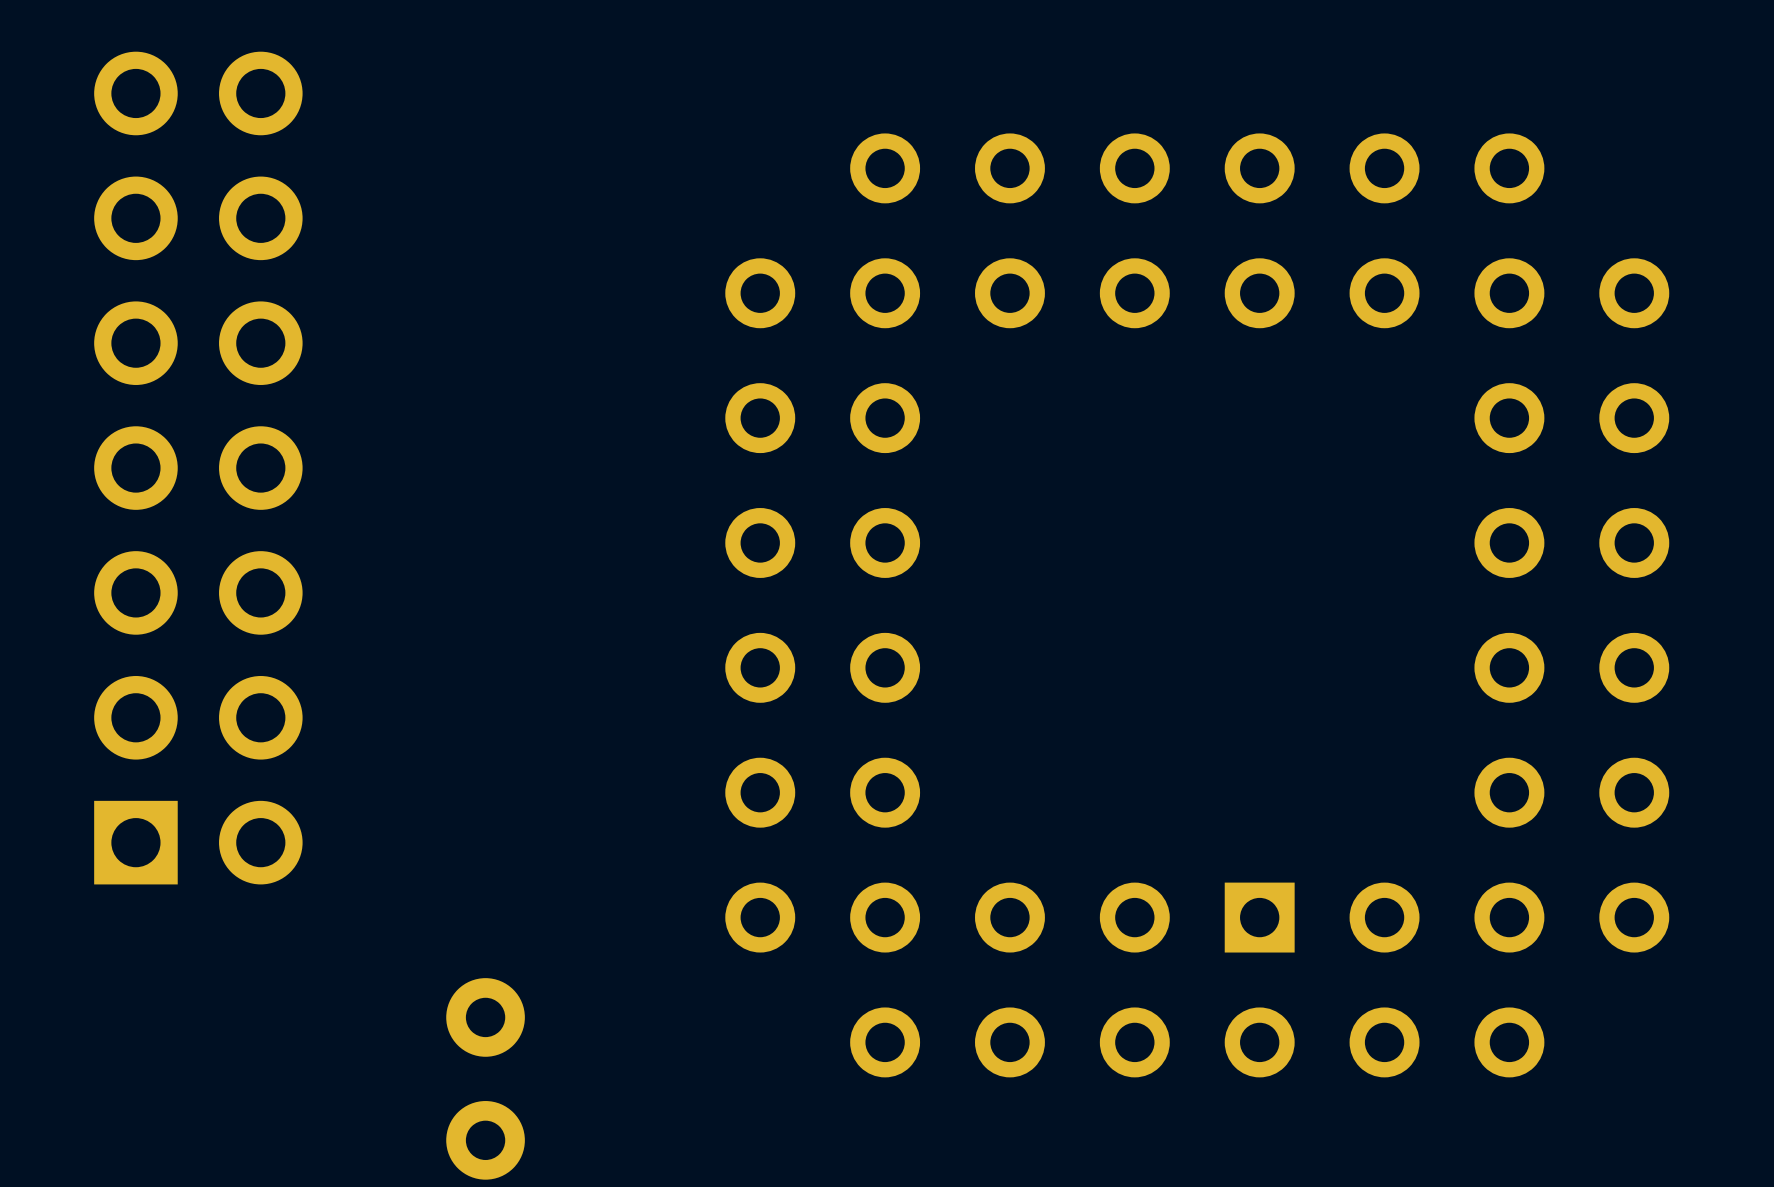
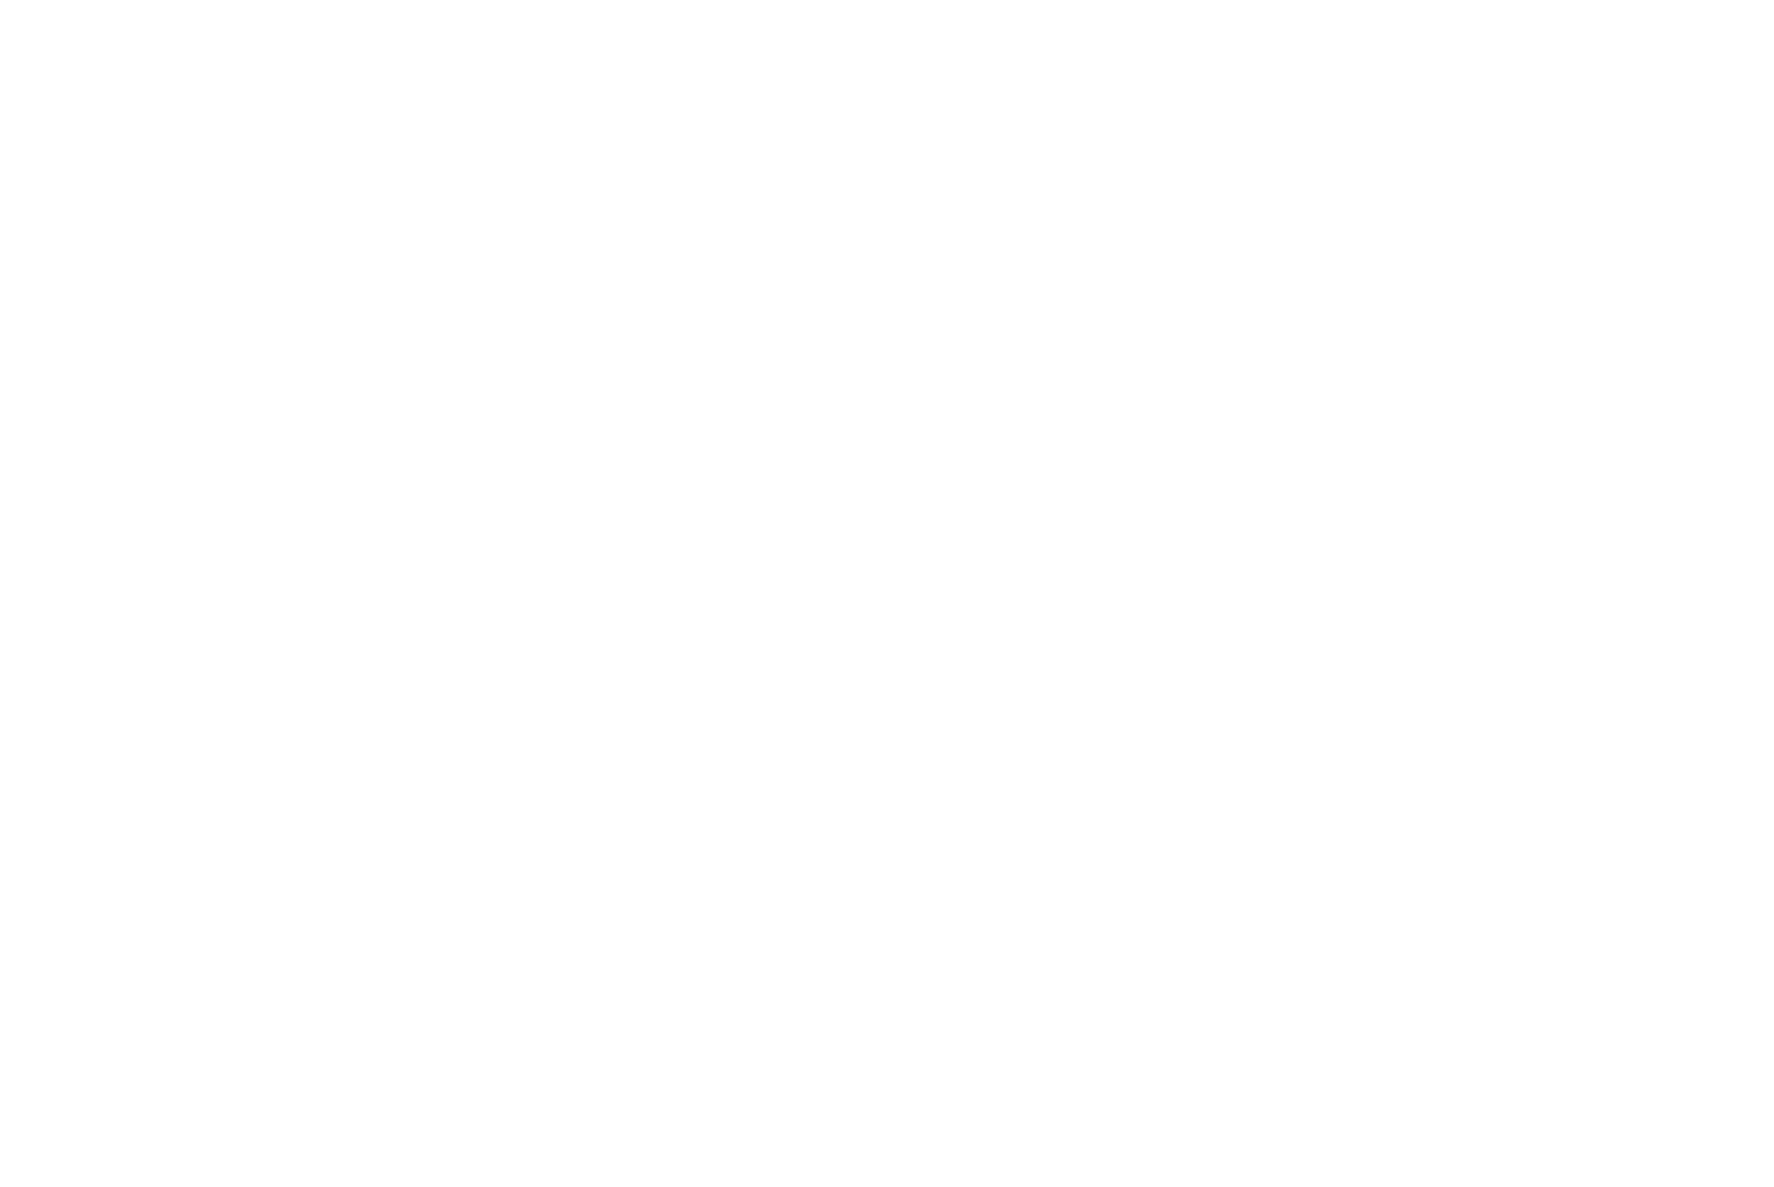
part: (198, 468) -> none
part: (1197, 605) -> none
part: (485, 1078) -> none

